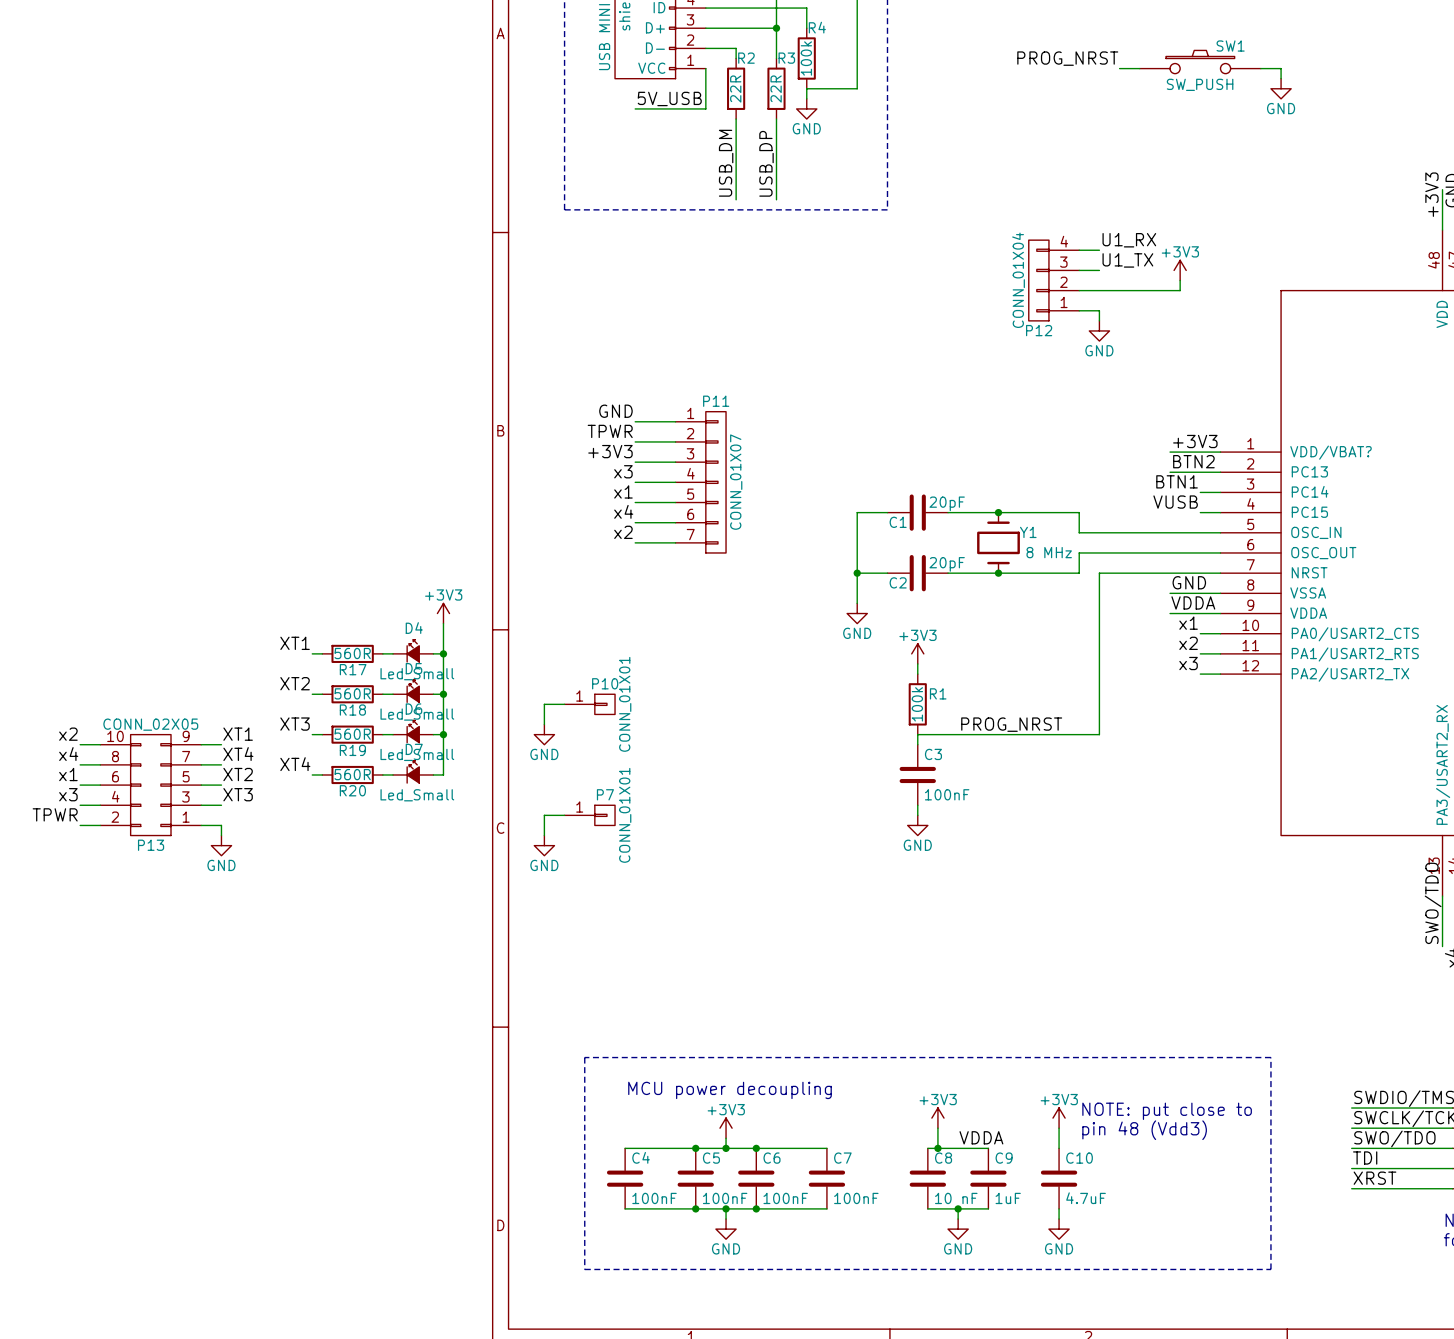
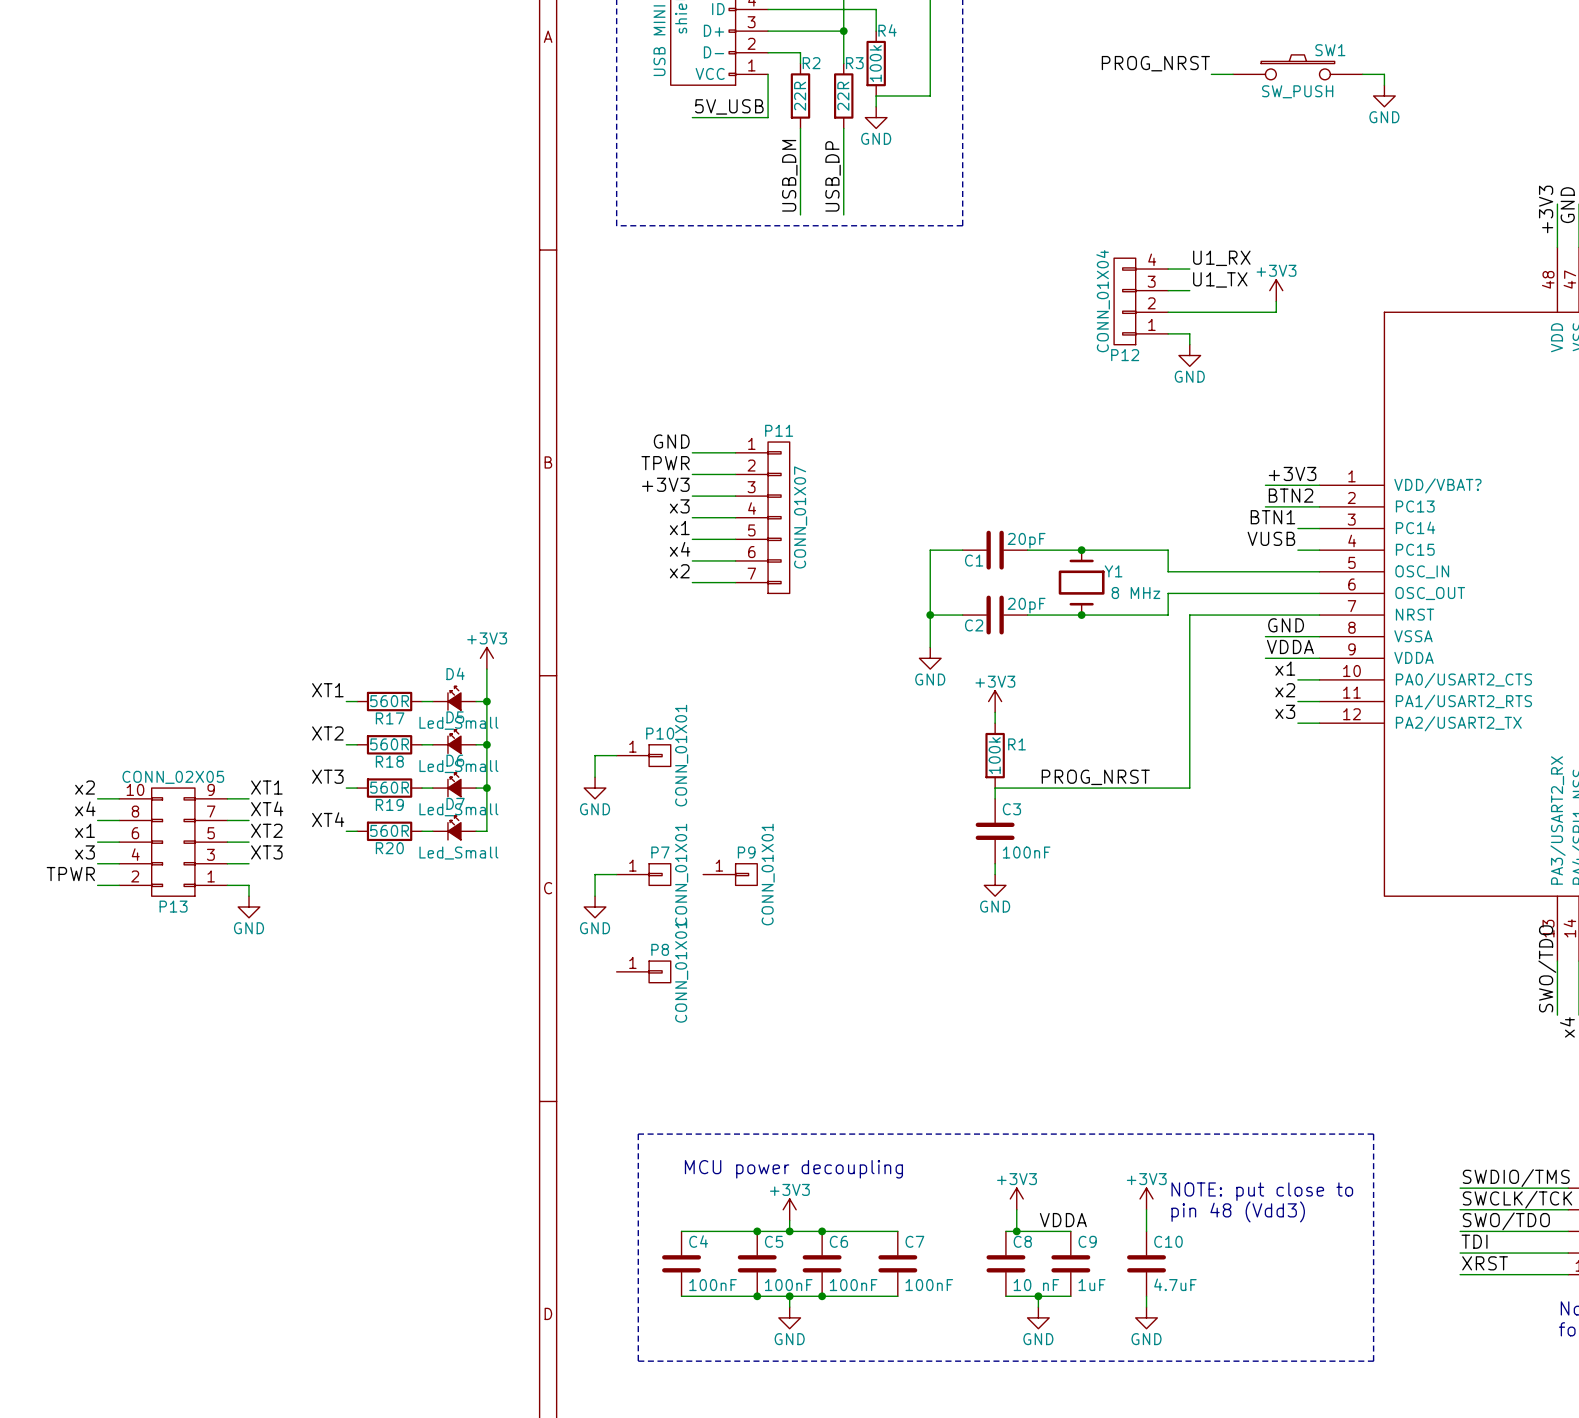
P9: none -> CONN_01X01 (730, 874)
P8: none -> CONN_01X01 (643, 971)

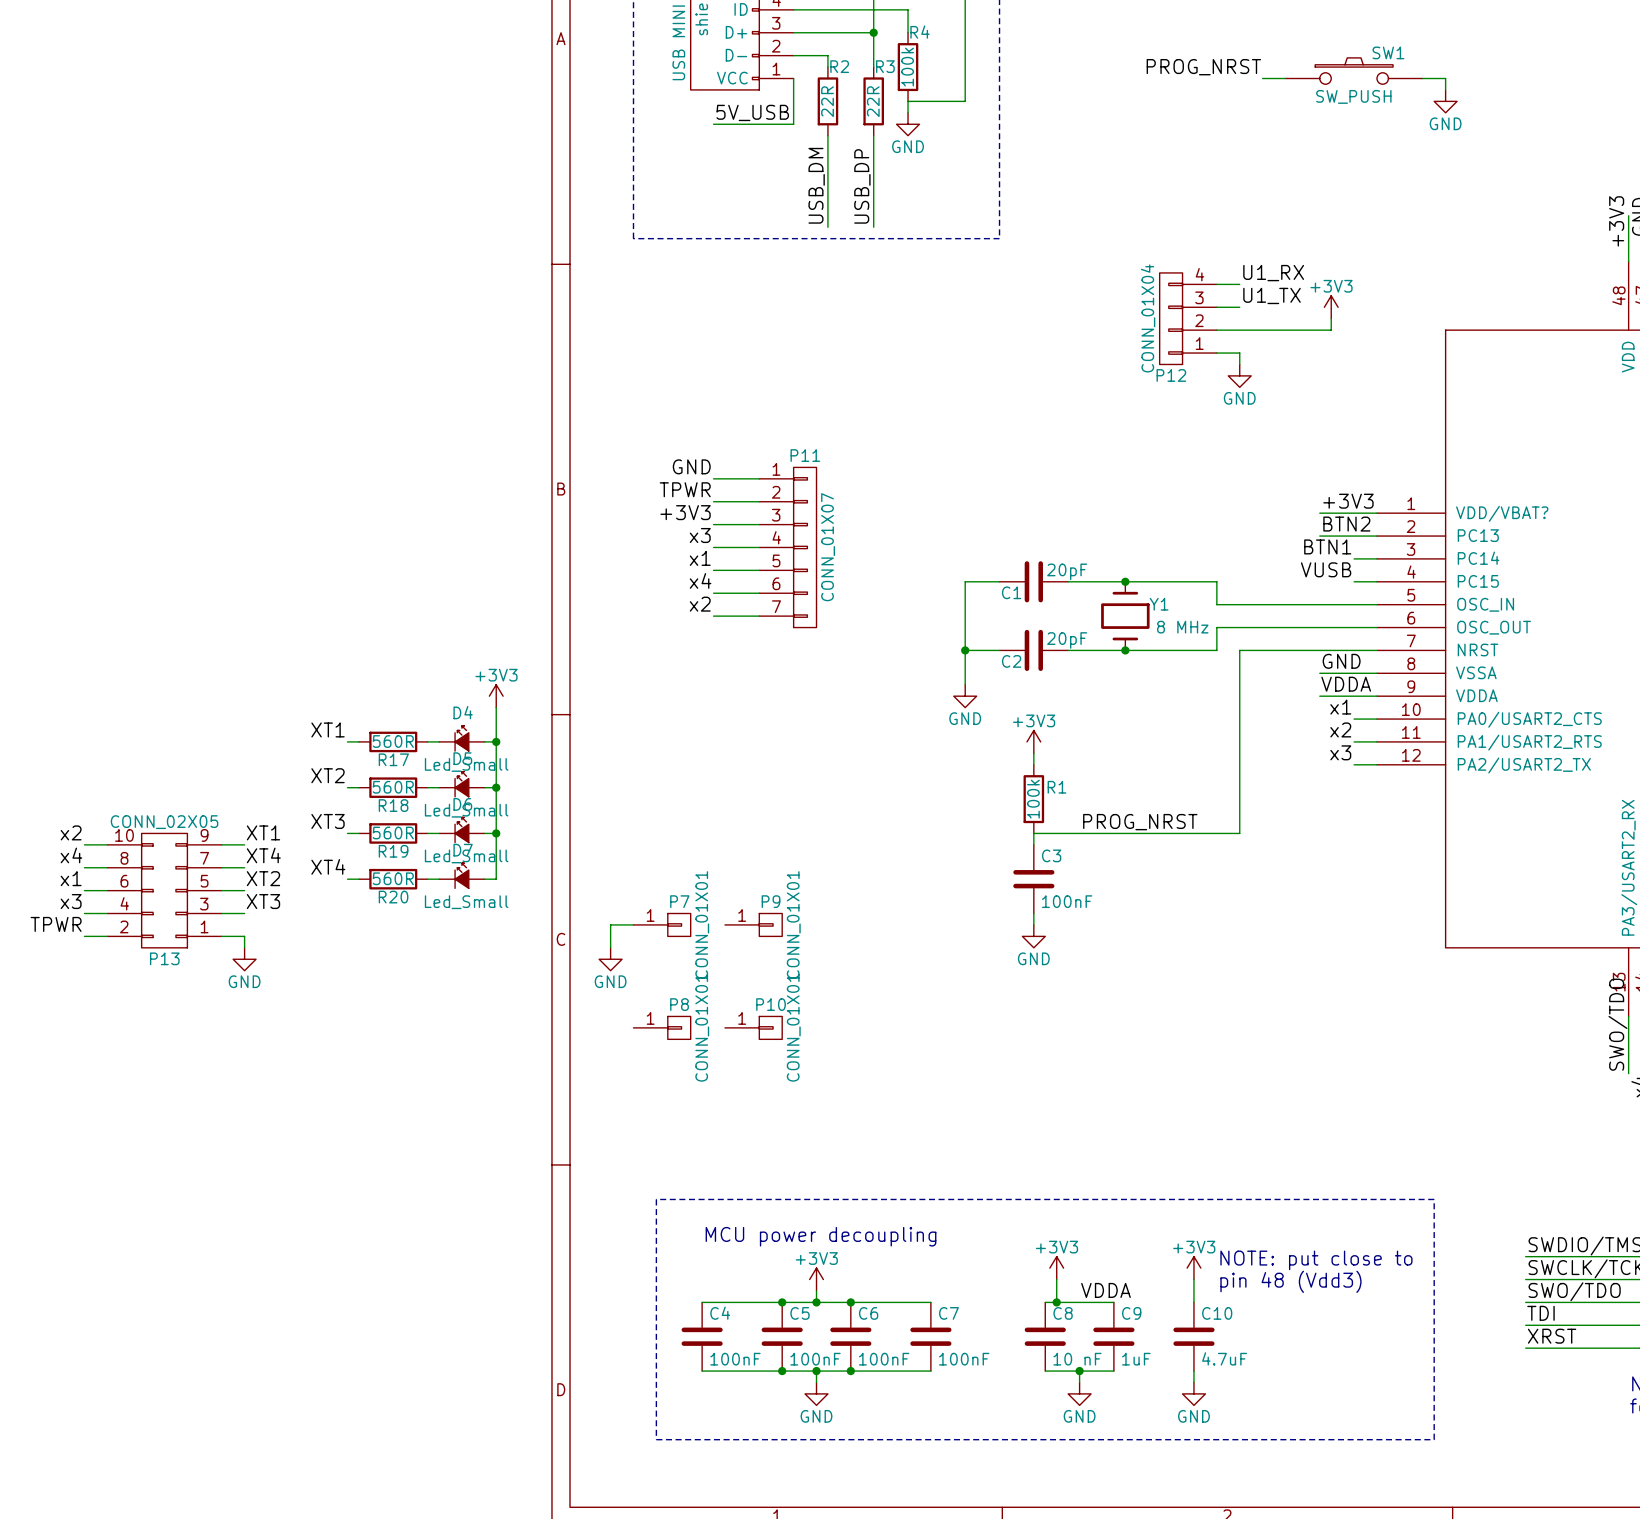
wire: (616, 755) (595, 755) (595, 777) -> none
P10 position: (643, 755) -> (753, 1027)
power symbol: GND (595, 788) -> none

